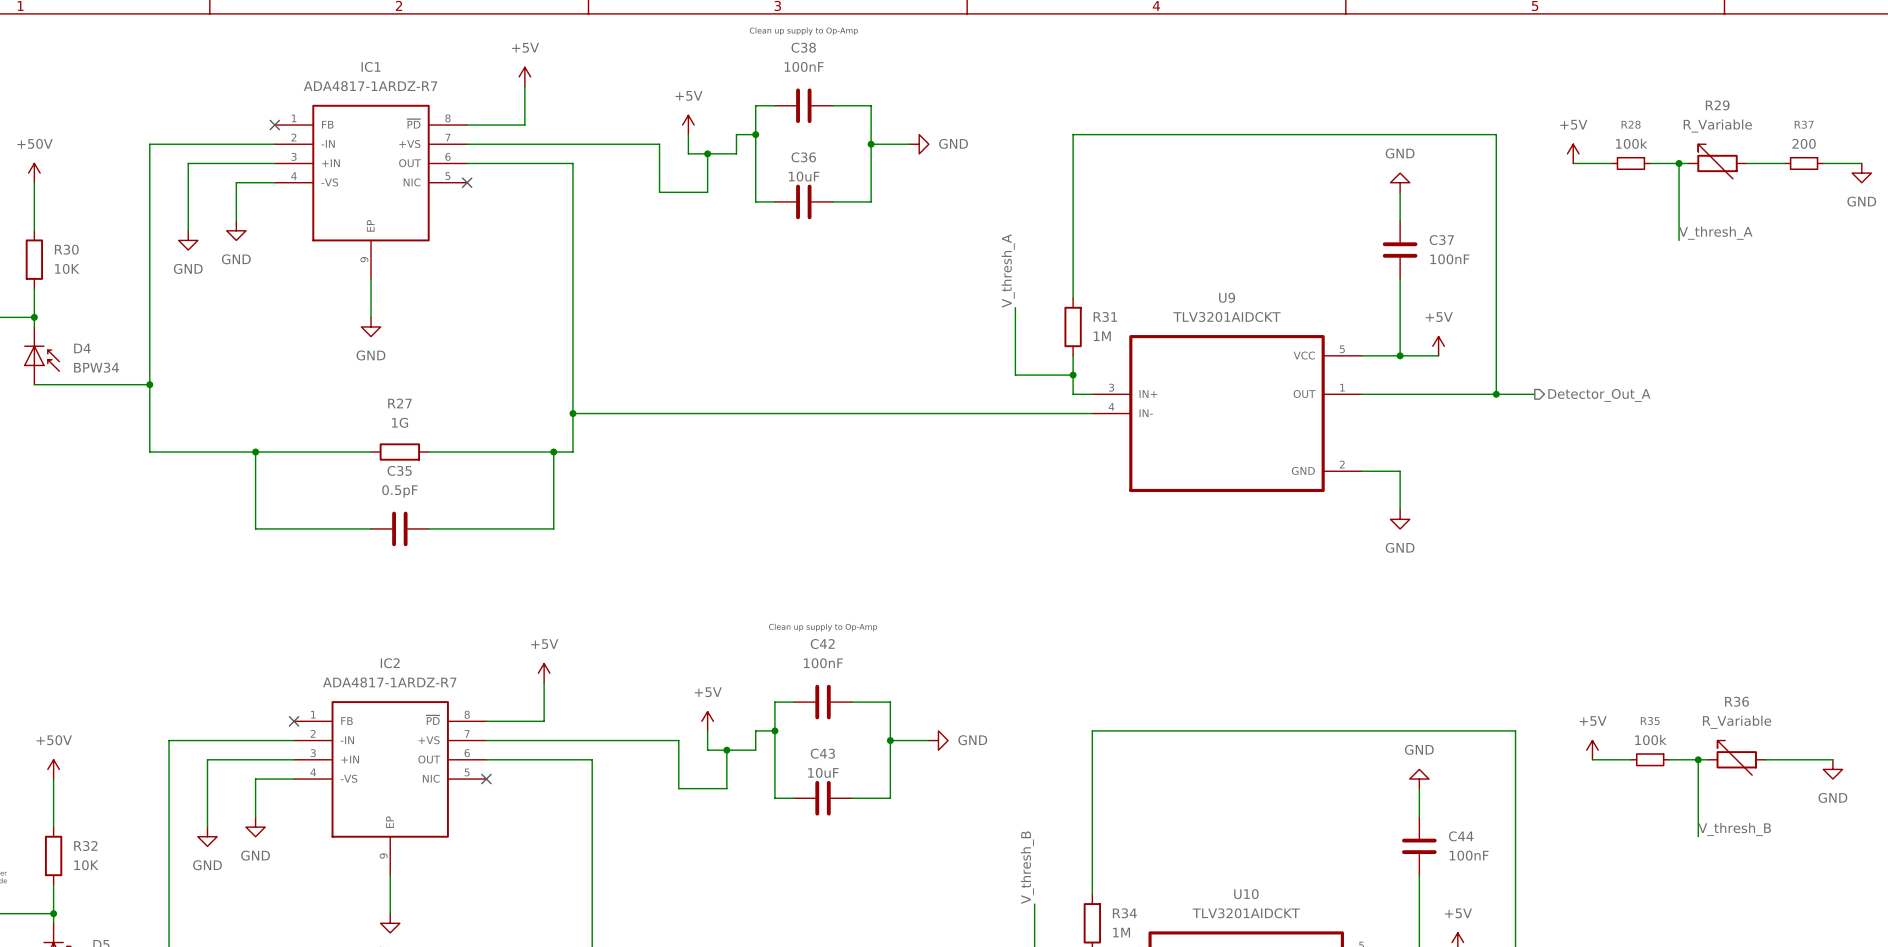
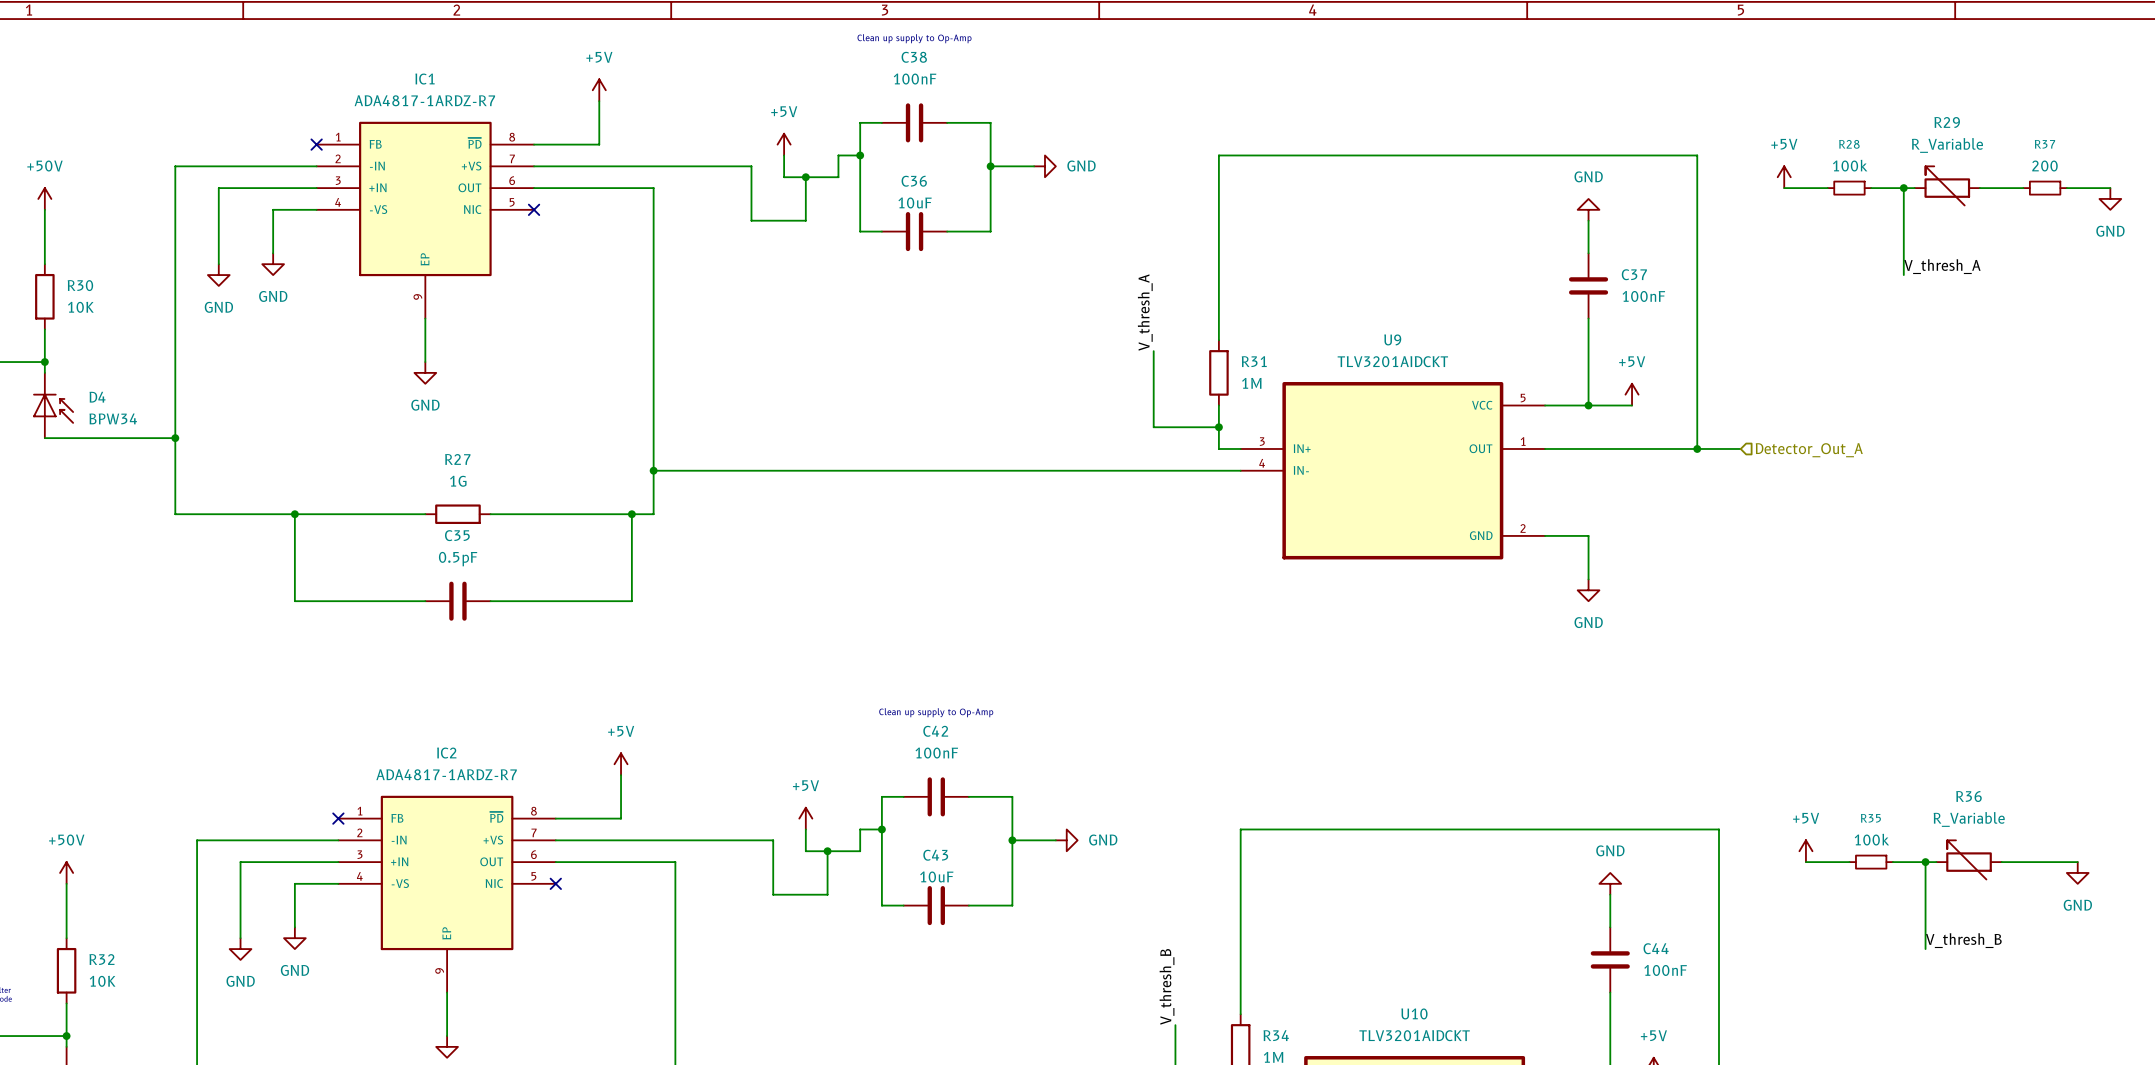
hierarchical label shape: output (1599, 395) -> input (1809, 450)

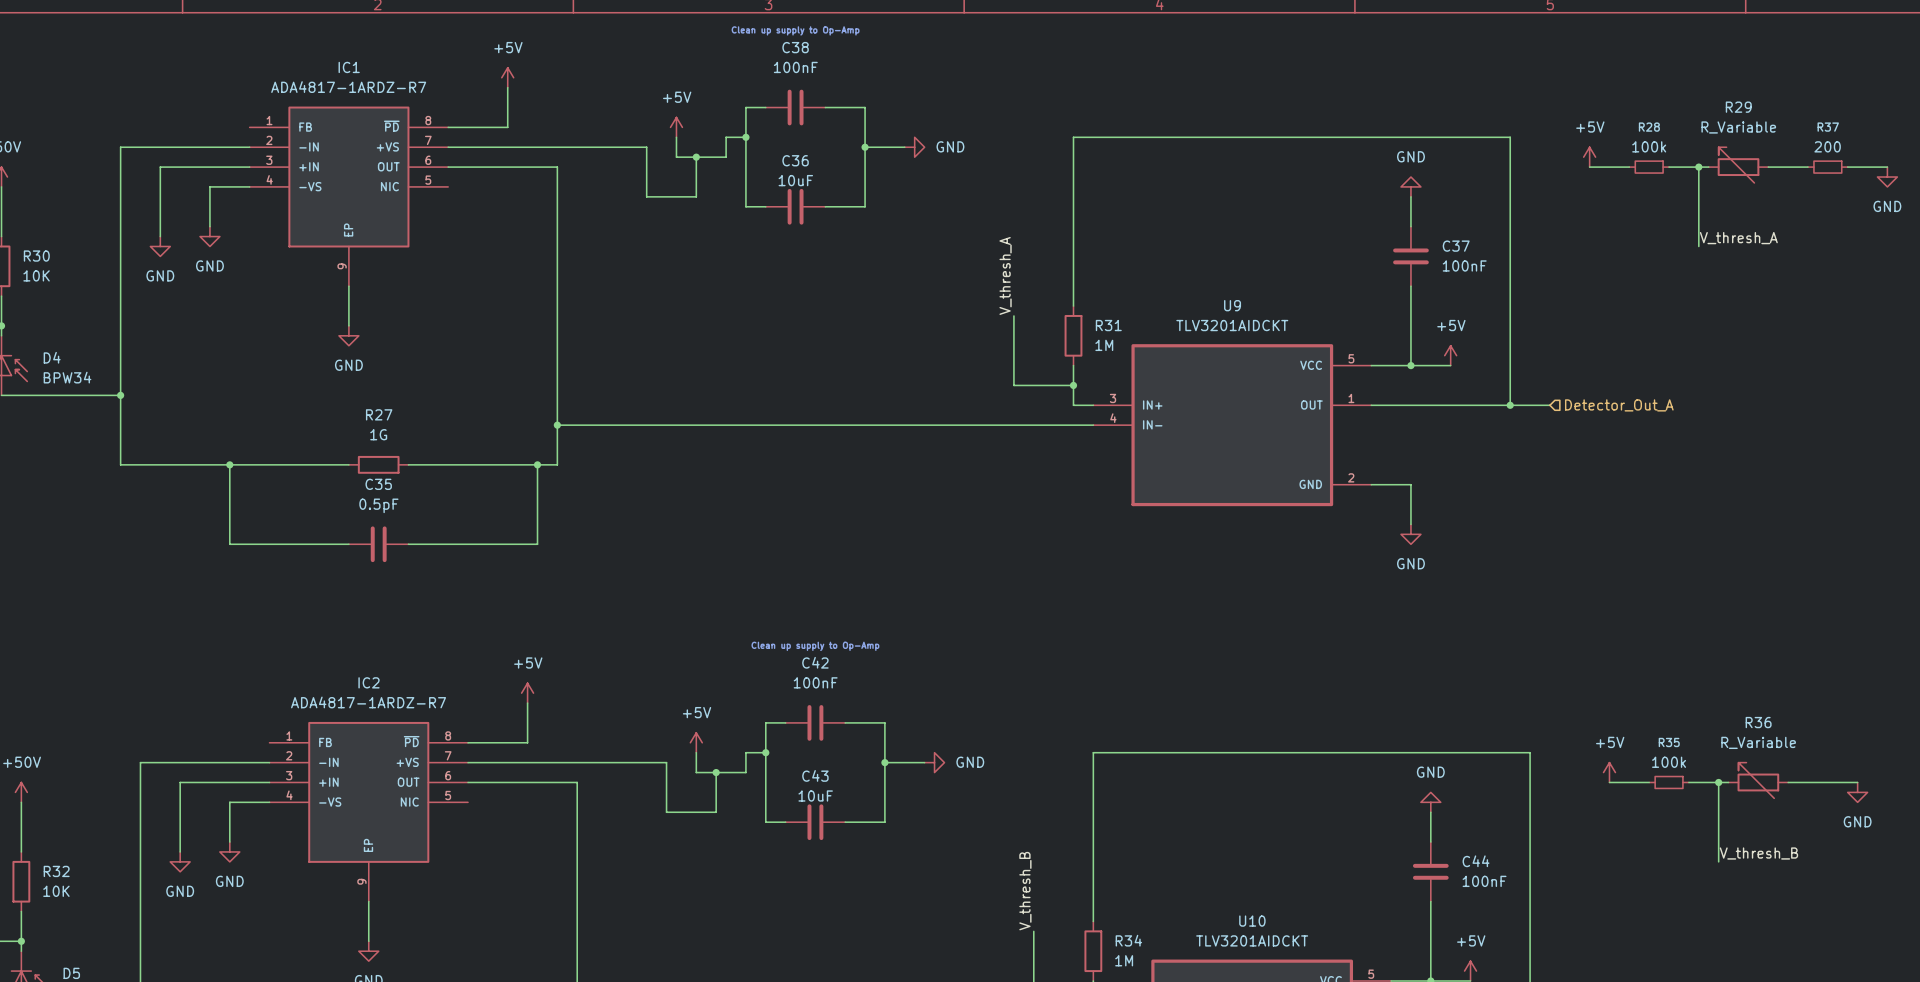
no-connect mark: (316, 144) -> none
no-connect mark: (534, 209) -> none
no-connect mark: (338, 818) -> none
no-connect mark: (555, 883) -> none

